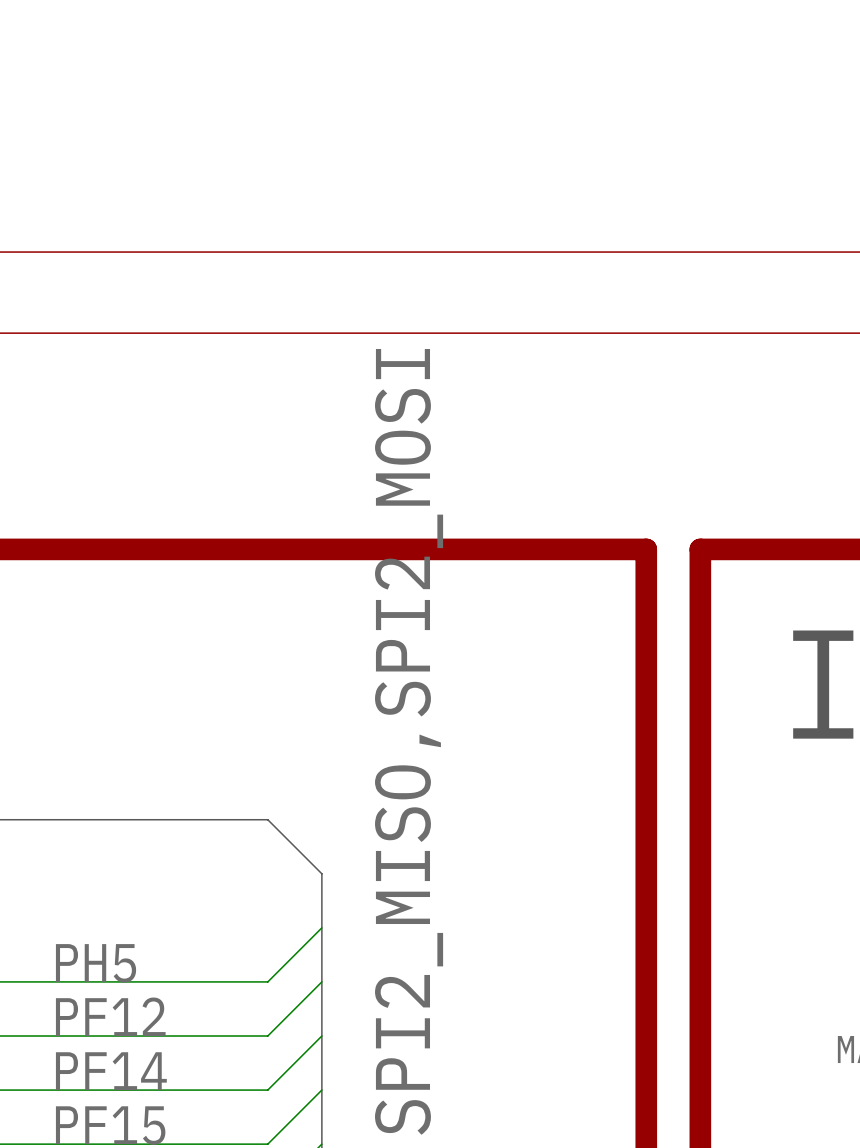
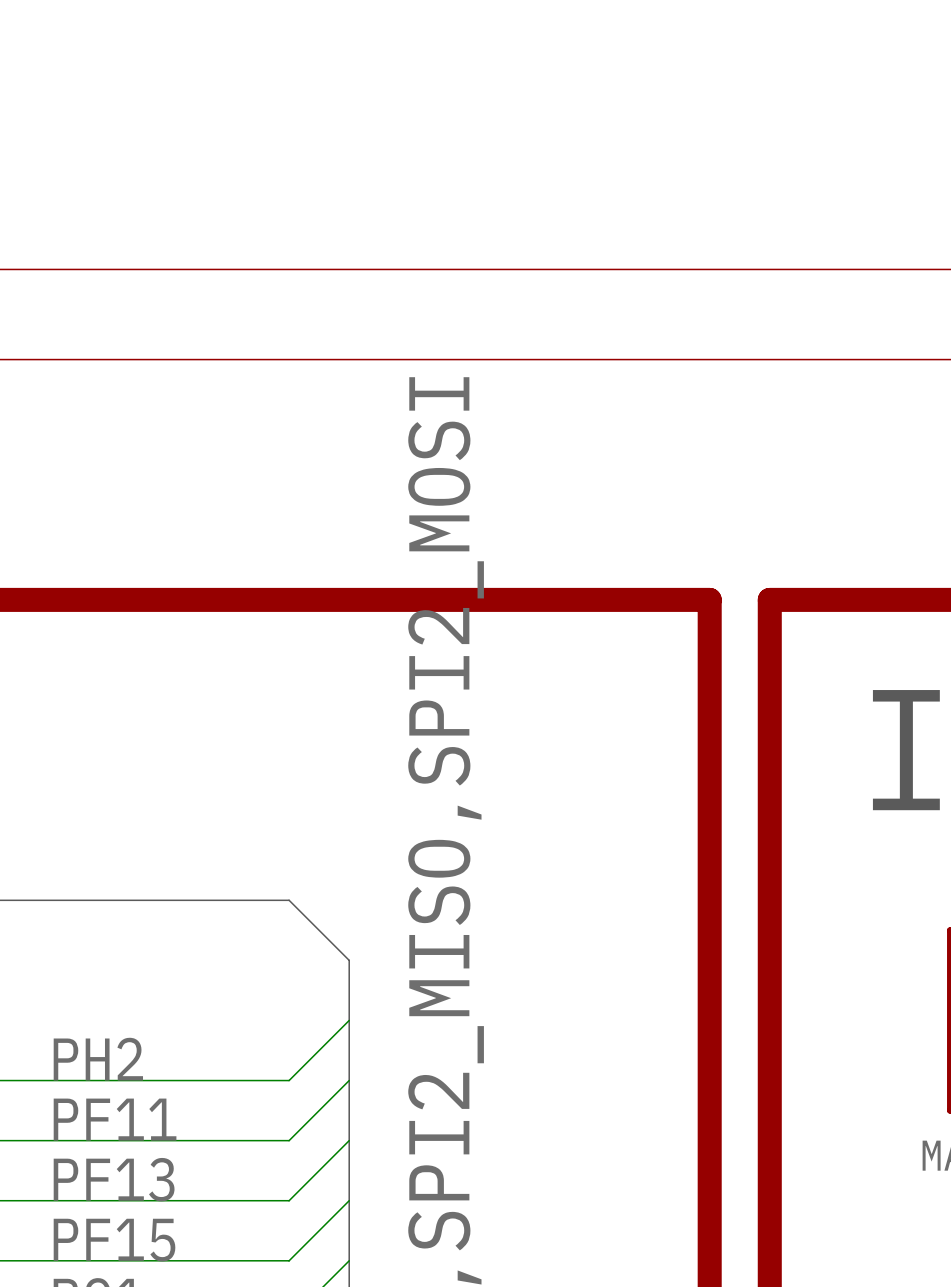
label: PH5 (96, 963) -> PH2 (98, 1059)
label: PF12 (110, 1016) -> PF11 (115, 1119)
label: PF14 (111, 1071) -> PF13 (114, 1179)

